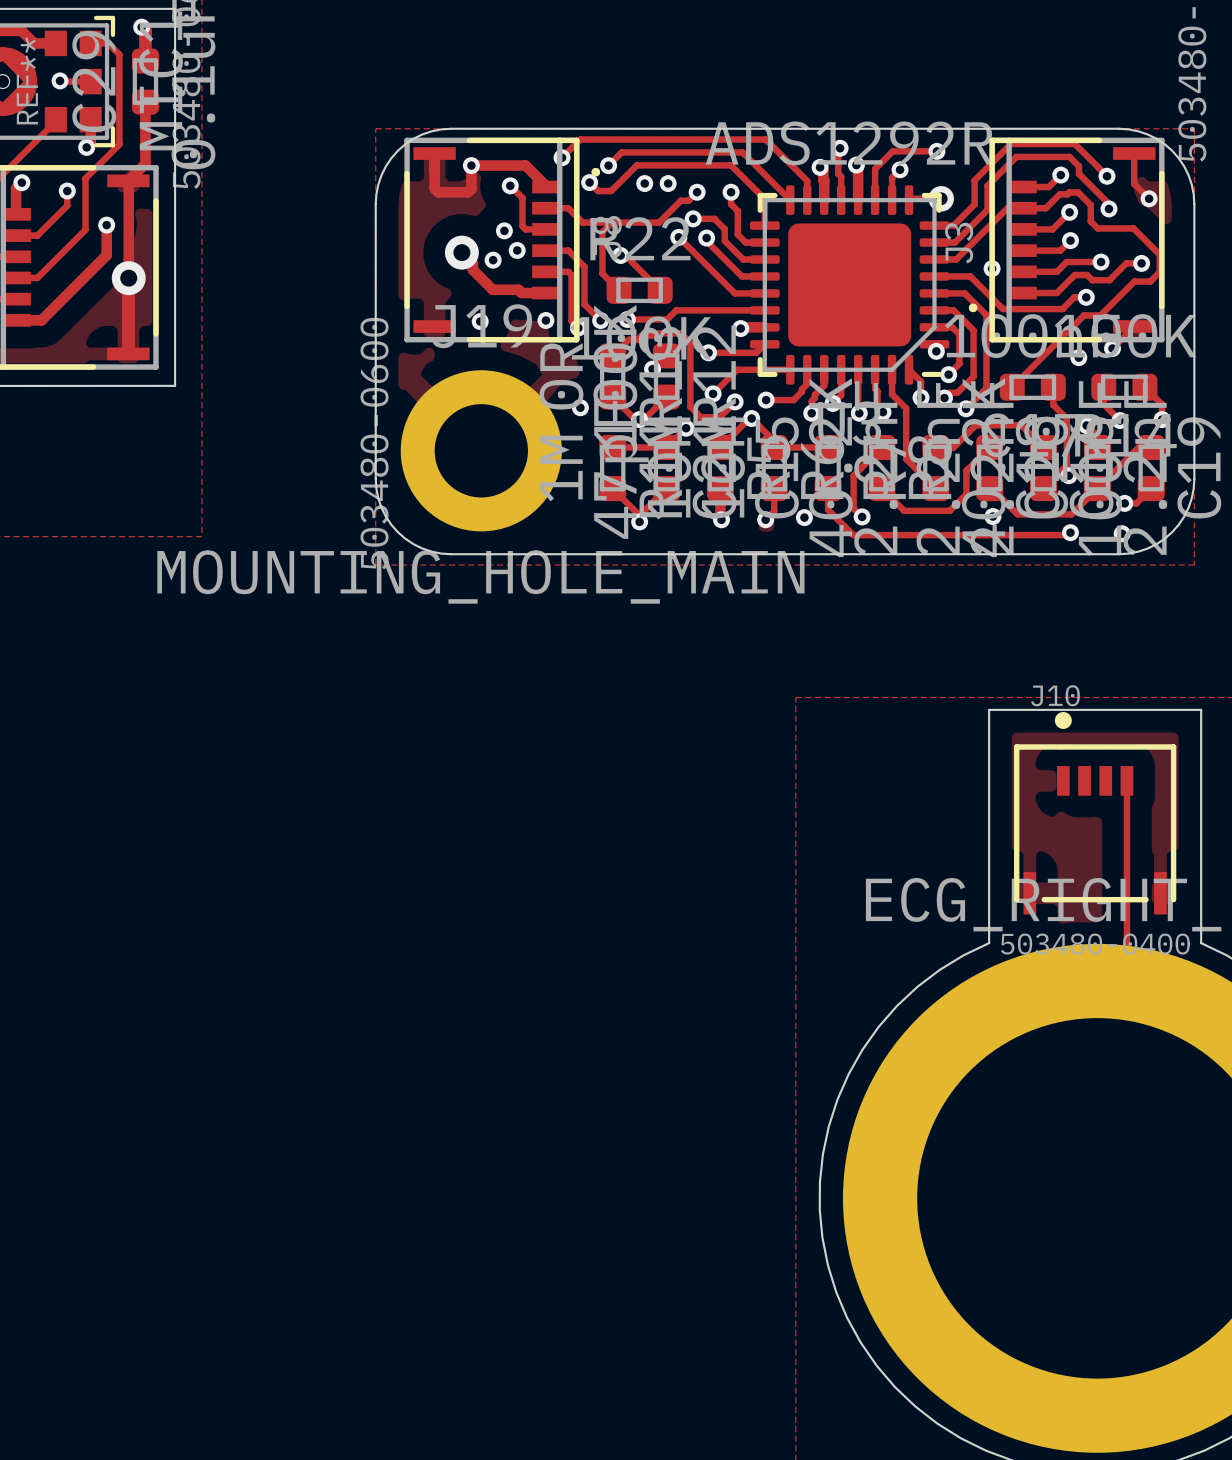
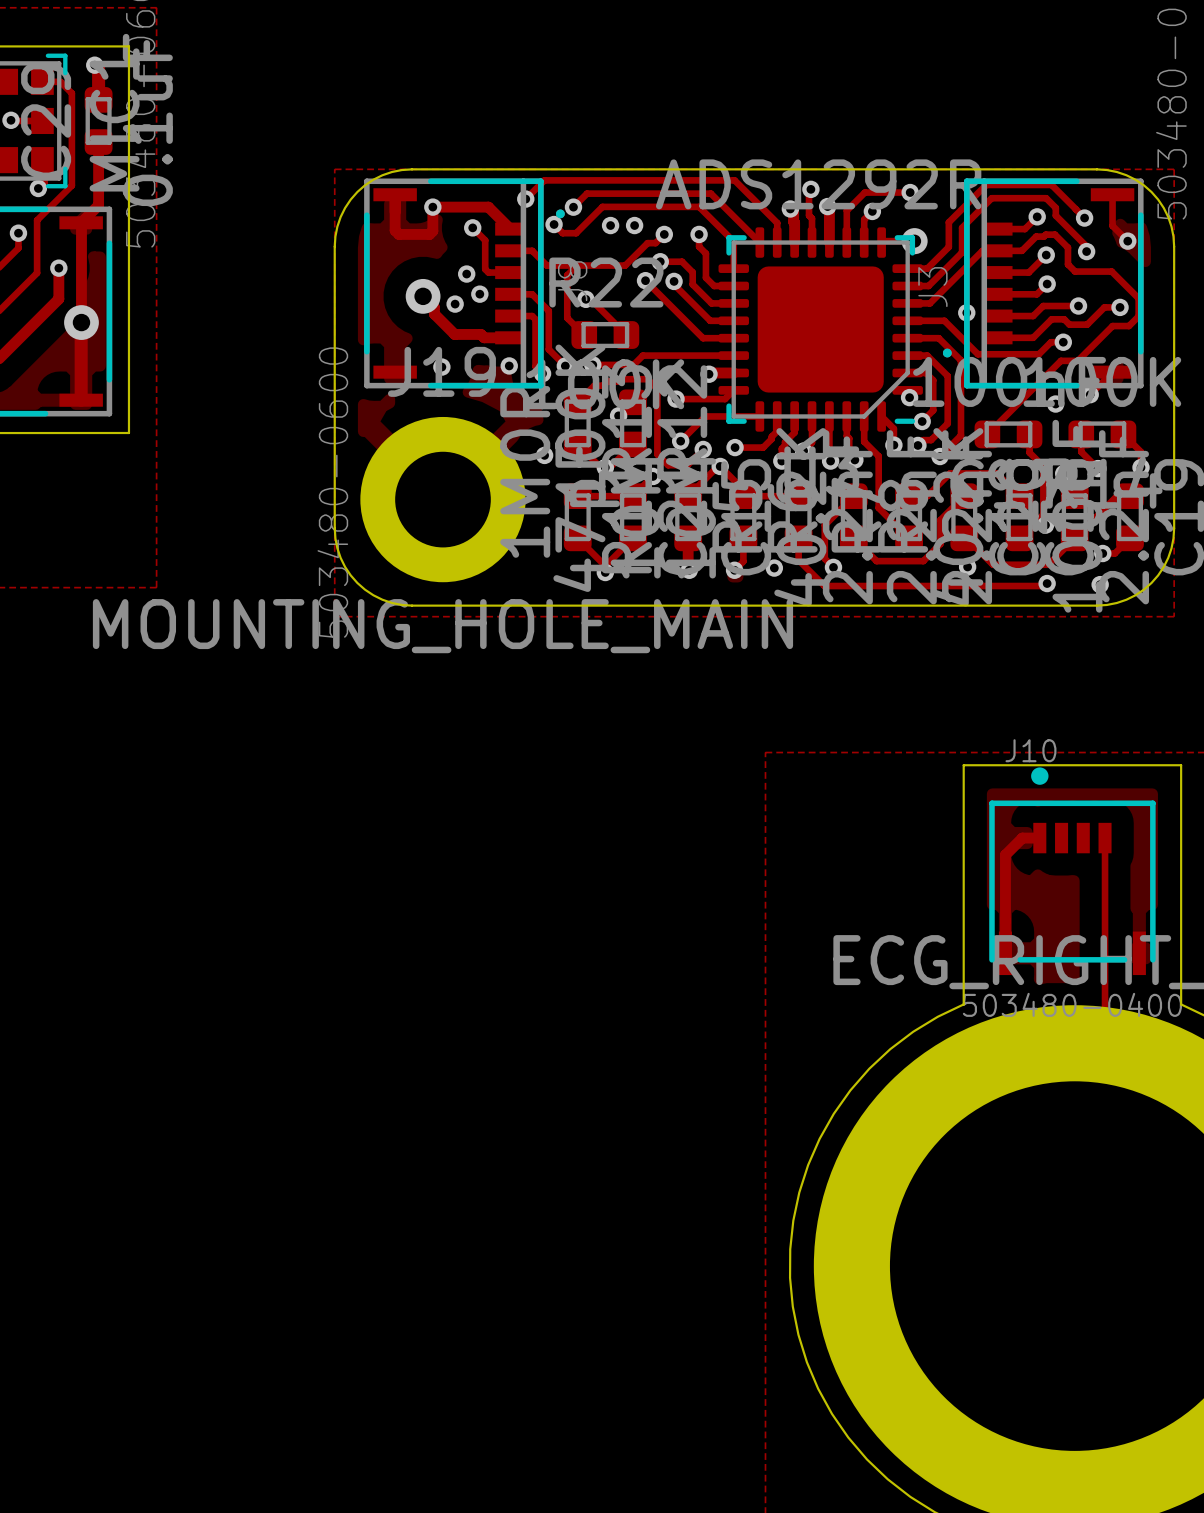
track: none -> (1039, 838) (1022, 838) (1005, 855) (1005, 953)

